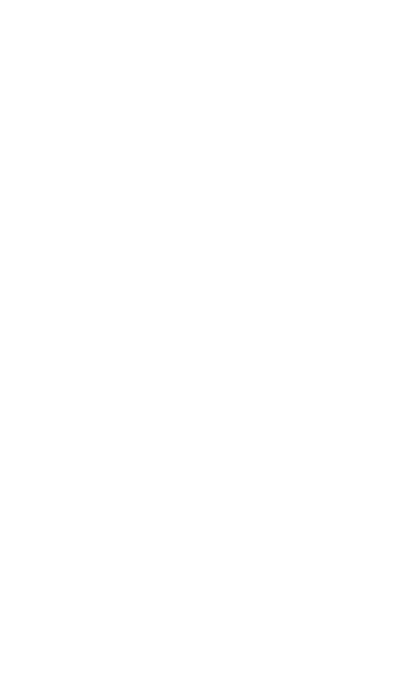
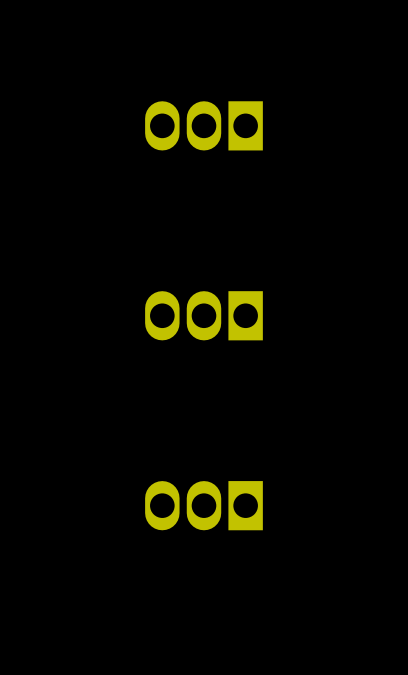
part: none -> (203, 125)
part: none -> (203, 315)
part: none -> (203, 505)

